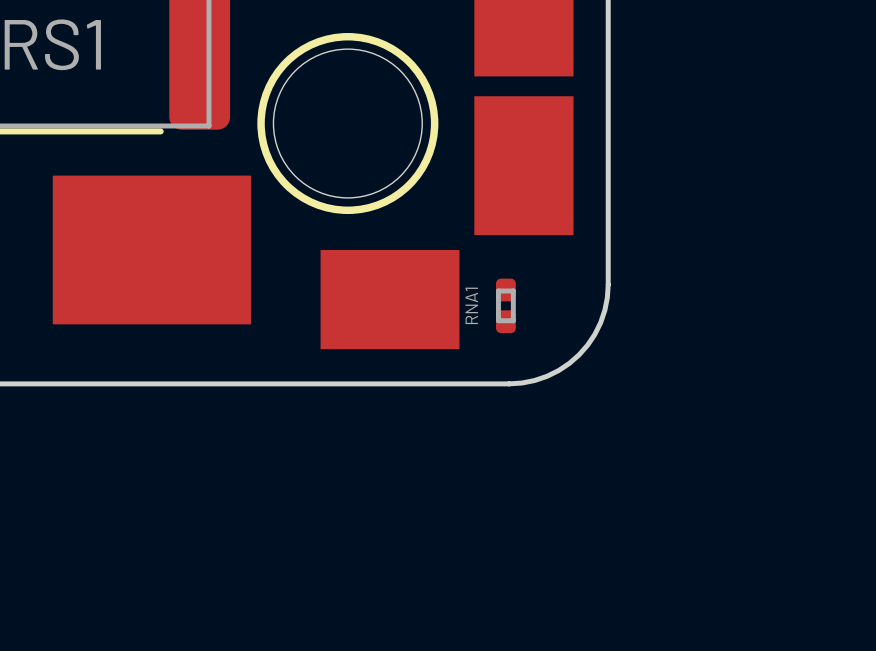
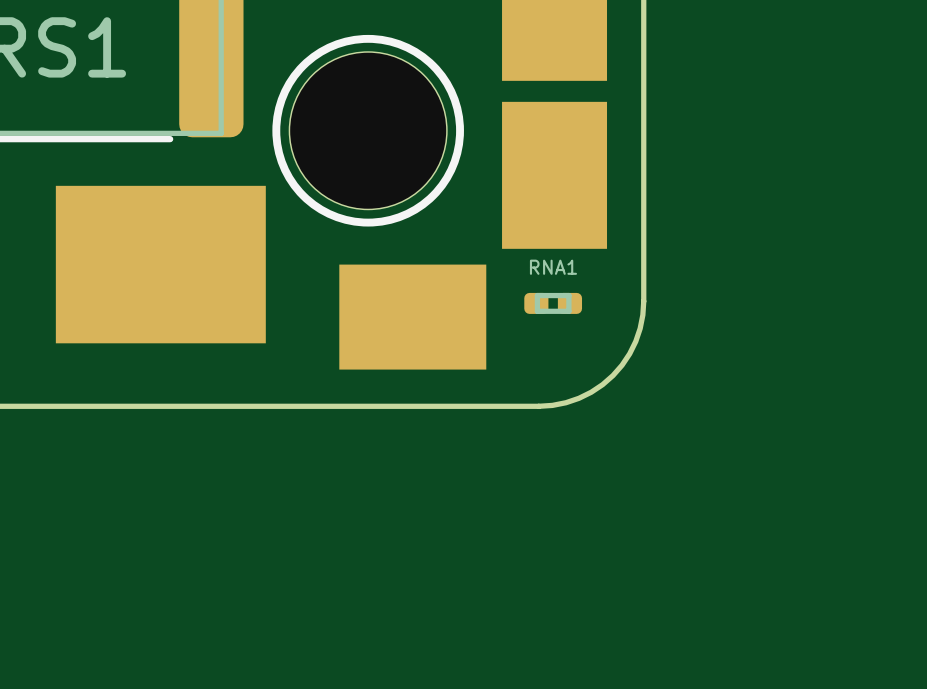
RNA1 rotation: 0° (505, 305) -> 90° clockwise (553, 303)

